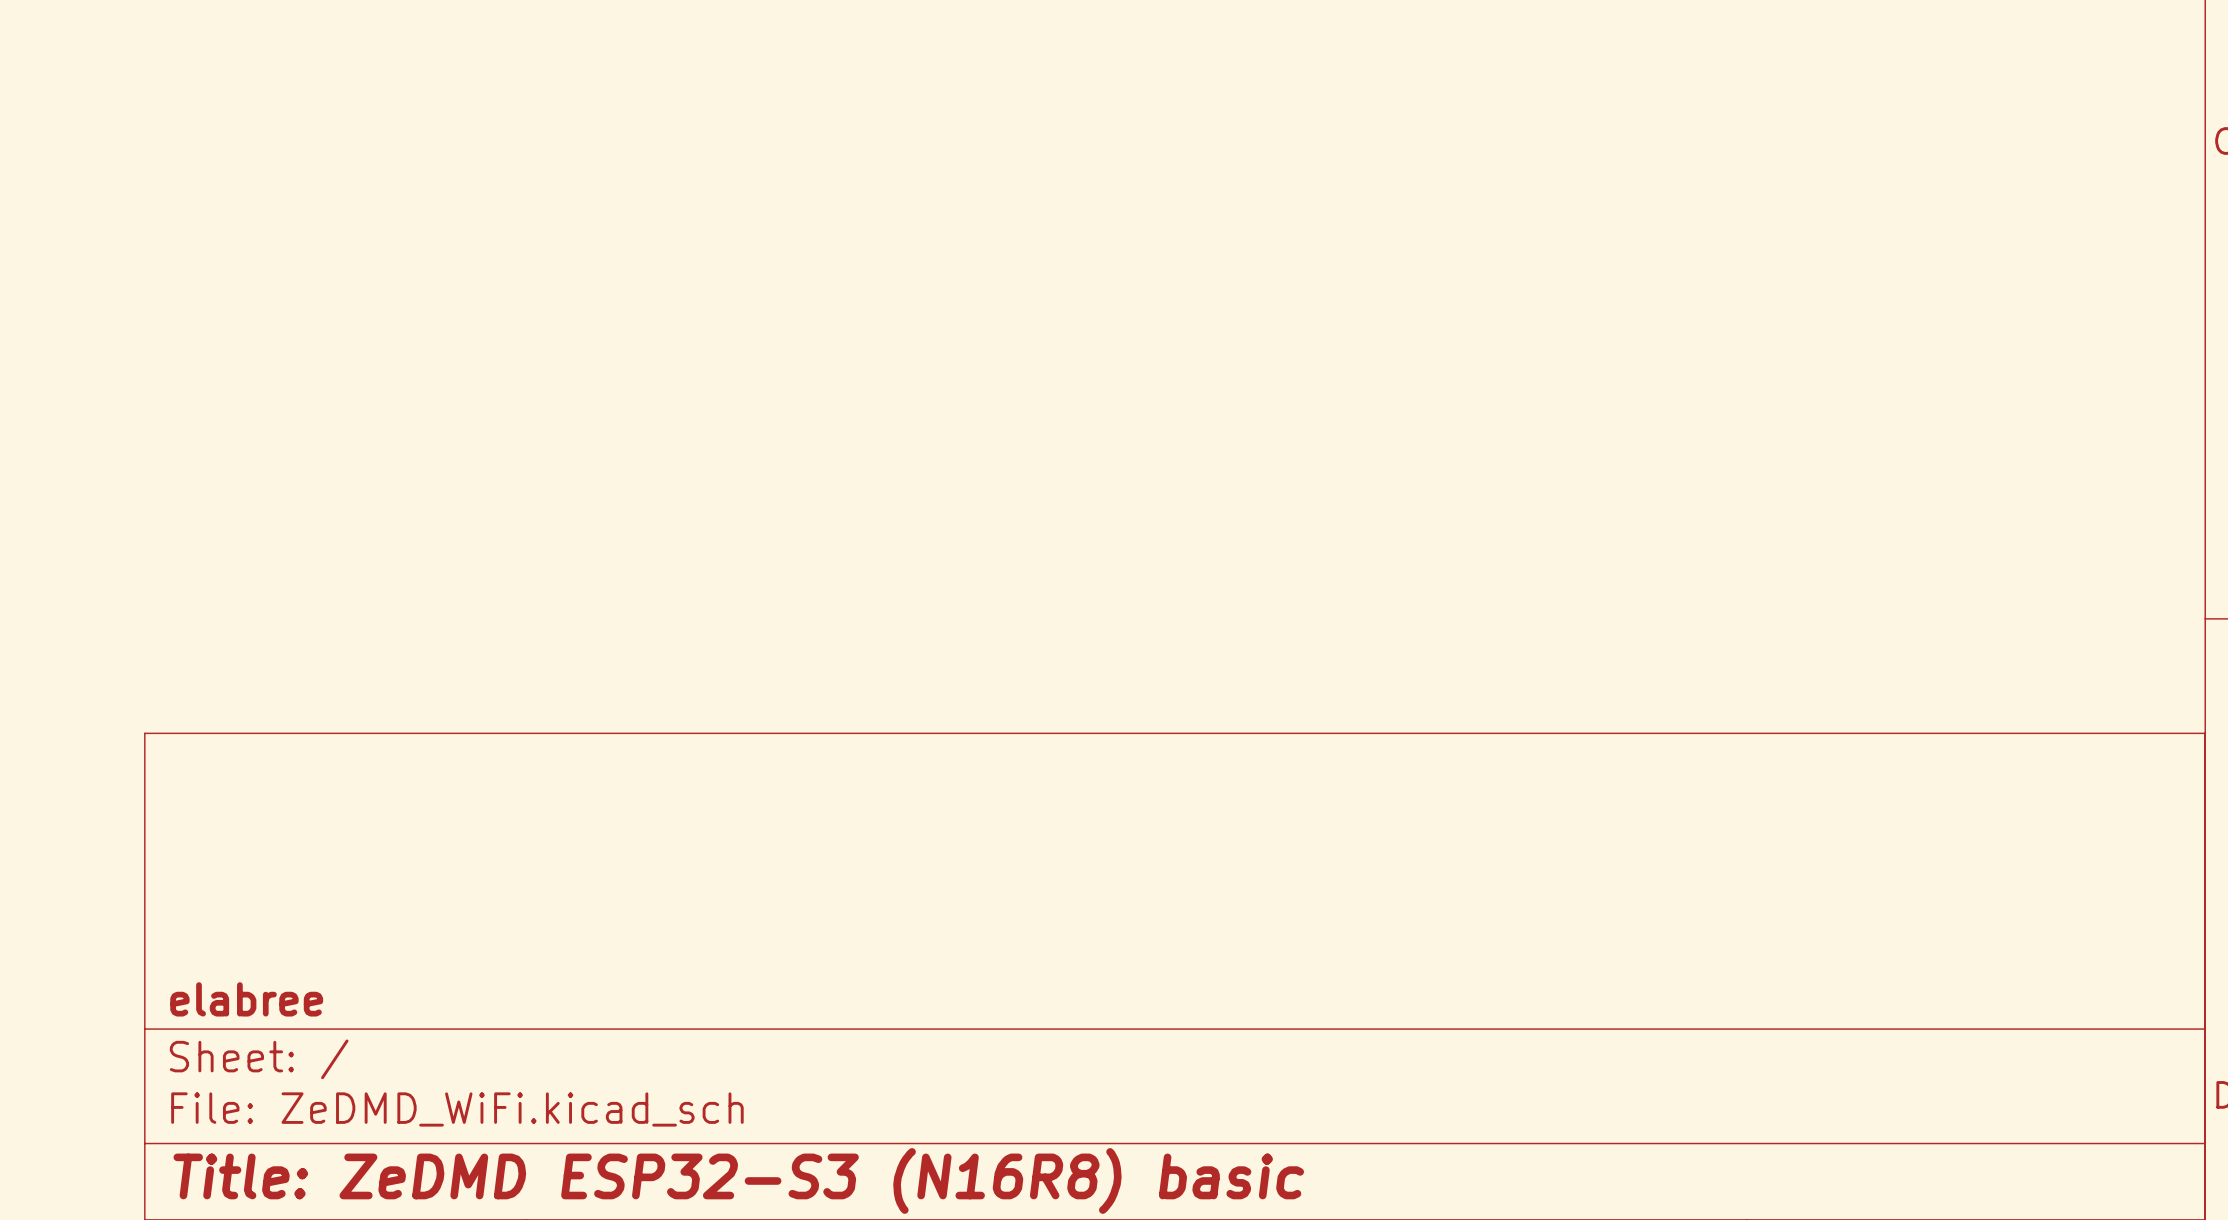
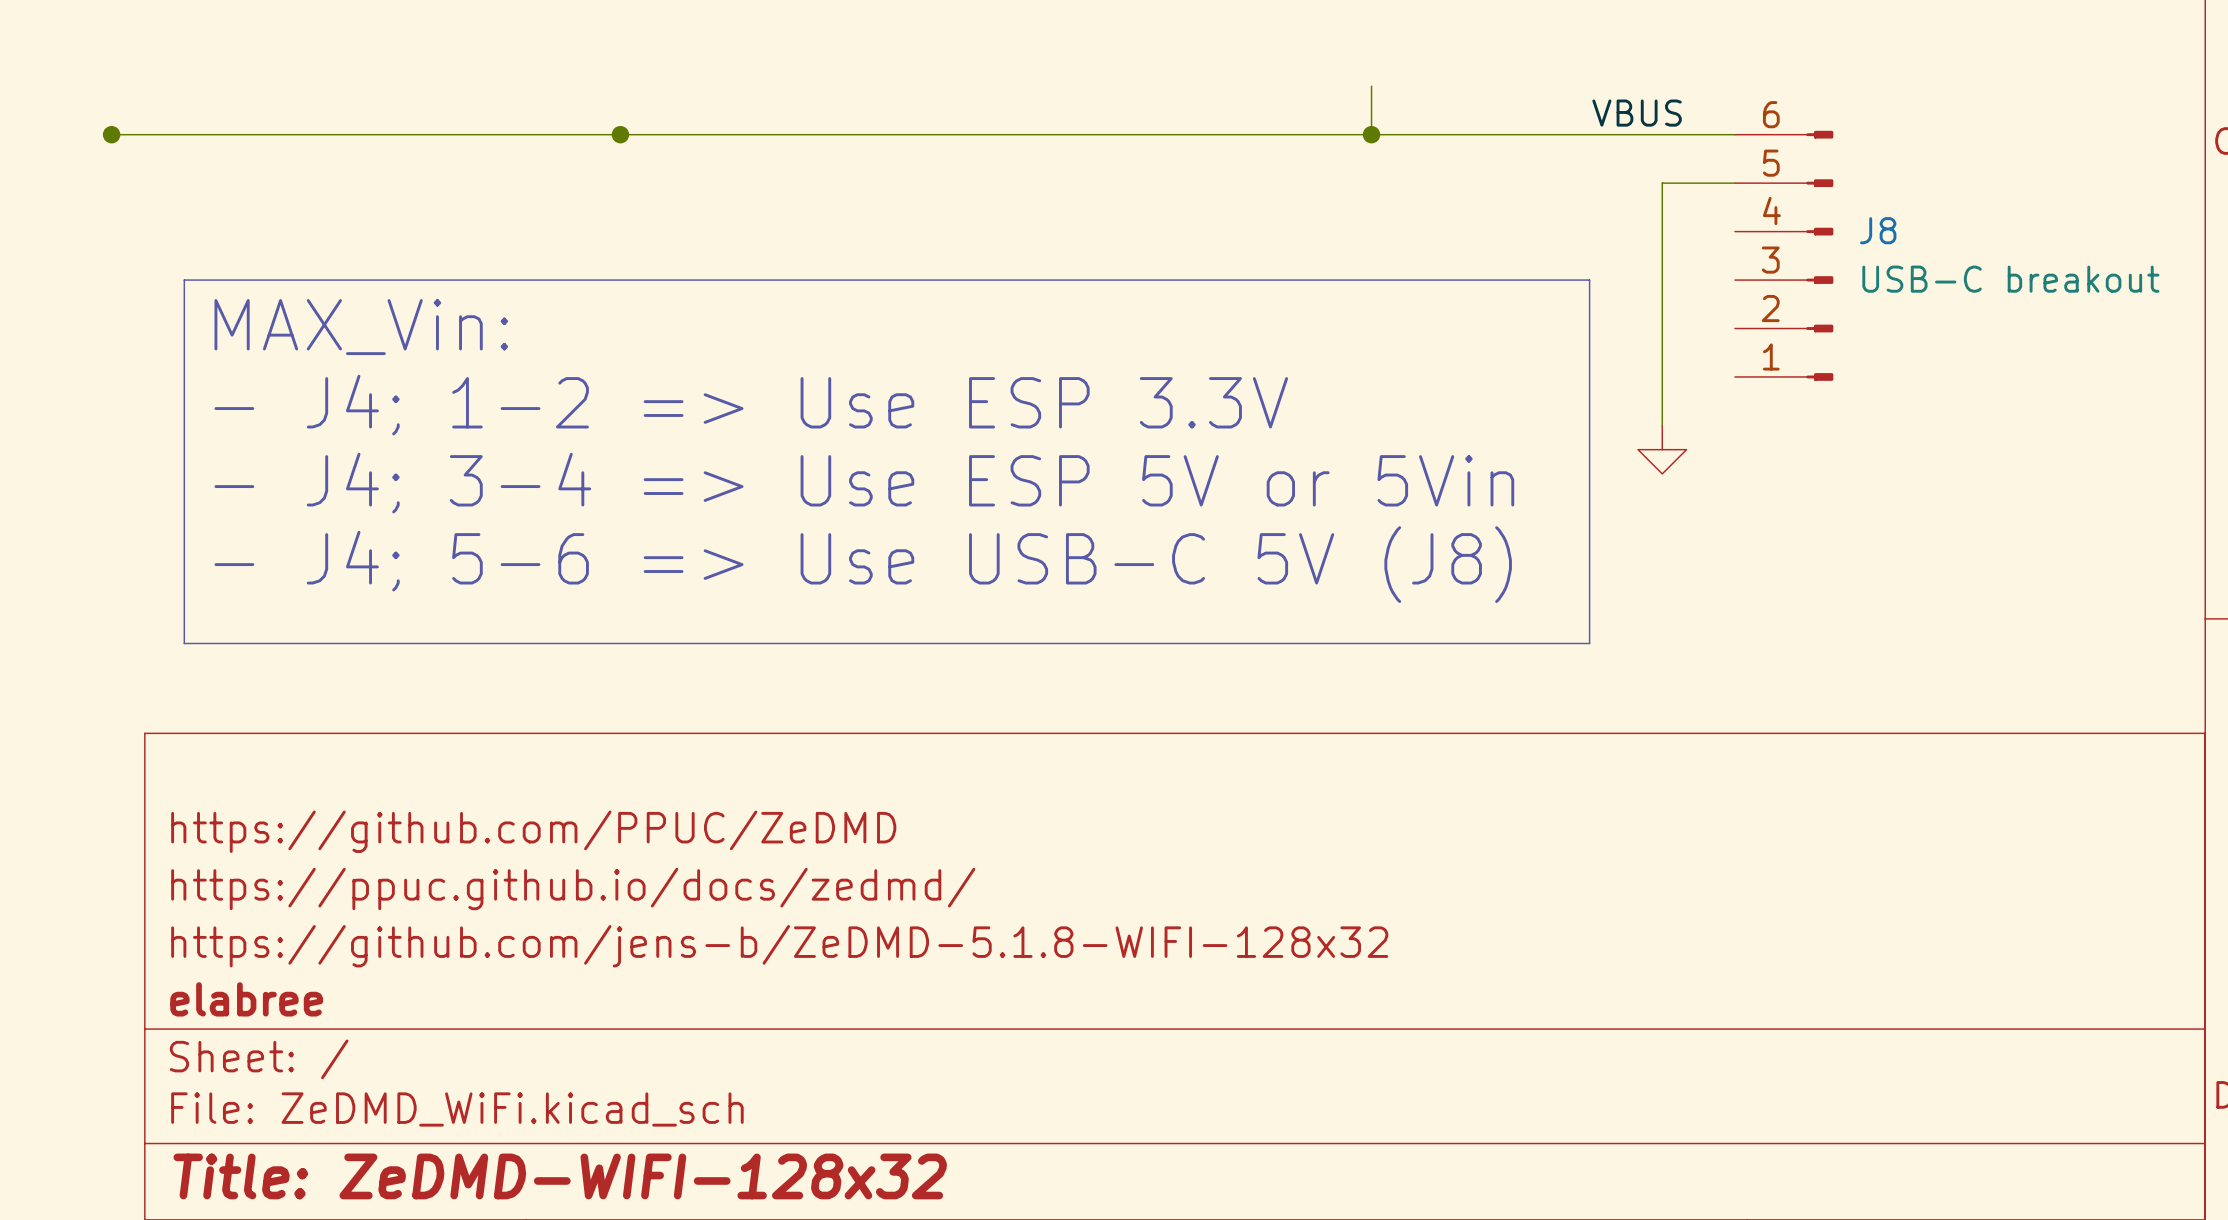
wire: none -> (1371, 86) (1371, 134)
label: none -> VBUS (1637, 113)
wire: none -> (111, 134) (1734, 134)
junction: none -> (111, 134)
junction: none -> (620, 134)
junction: none -> (1371, 134)
wire: none -> (1734, 183) (1662, 183) (1662, 425)
J8: none -> USB-C breakout (1784, 255)
line: none -> (184, 280) (1589, 280) (1589, 643) (184, 643) (184, 280)
text: none -> MAX_Vin: (361, 327)
text: none -> - J4; 1-2 => Use ESP 3.3V (751, 405)
power symbol: none -> (1662, 449)
text: none -> - J4; 3-4 => Use ESP 5V or 5Vin (864, 483)
text: none -> - J4; 5-6 => Use USB-C 5V (J8) (863, 564)
title block: none -> https://github.com/PPUC/ZeDMD (533, 831)
title block: none -> https://ppuc.github.io/docs/zedmd/ (573, 888)
title block: none -> https://github.com/jens-b/ZeDMD-5.1.8-WIFI-128x32 (779, 946)
title block: Title: ZeDMD ESP32-S3 (N16R8) basic (738, 1180) -> Title: ZeDMD-WIFI-128x32 (560, 1176)

